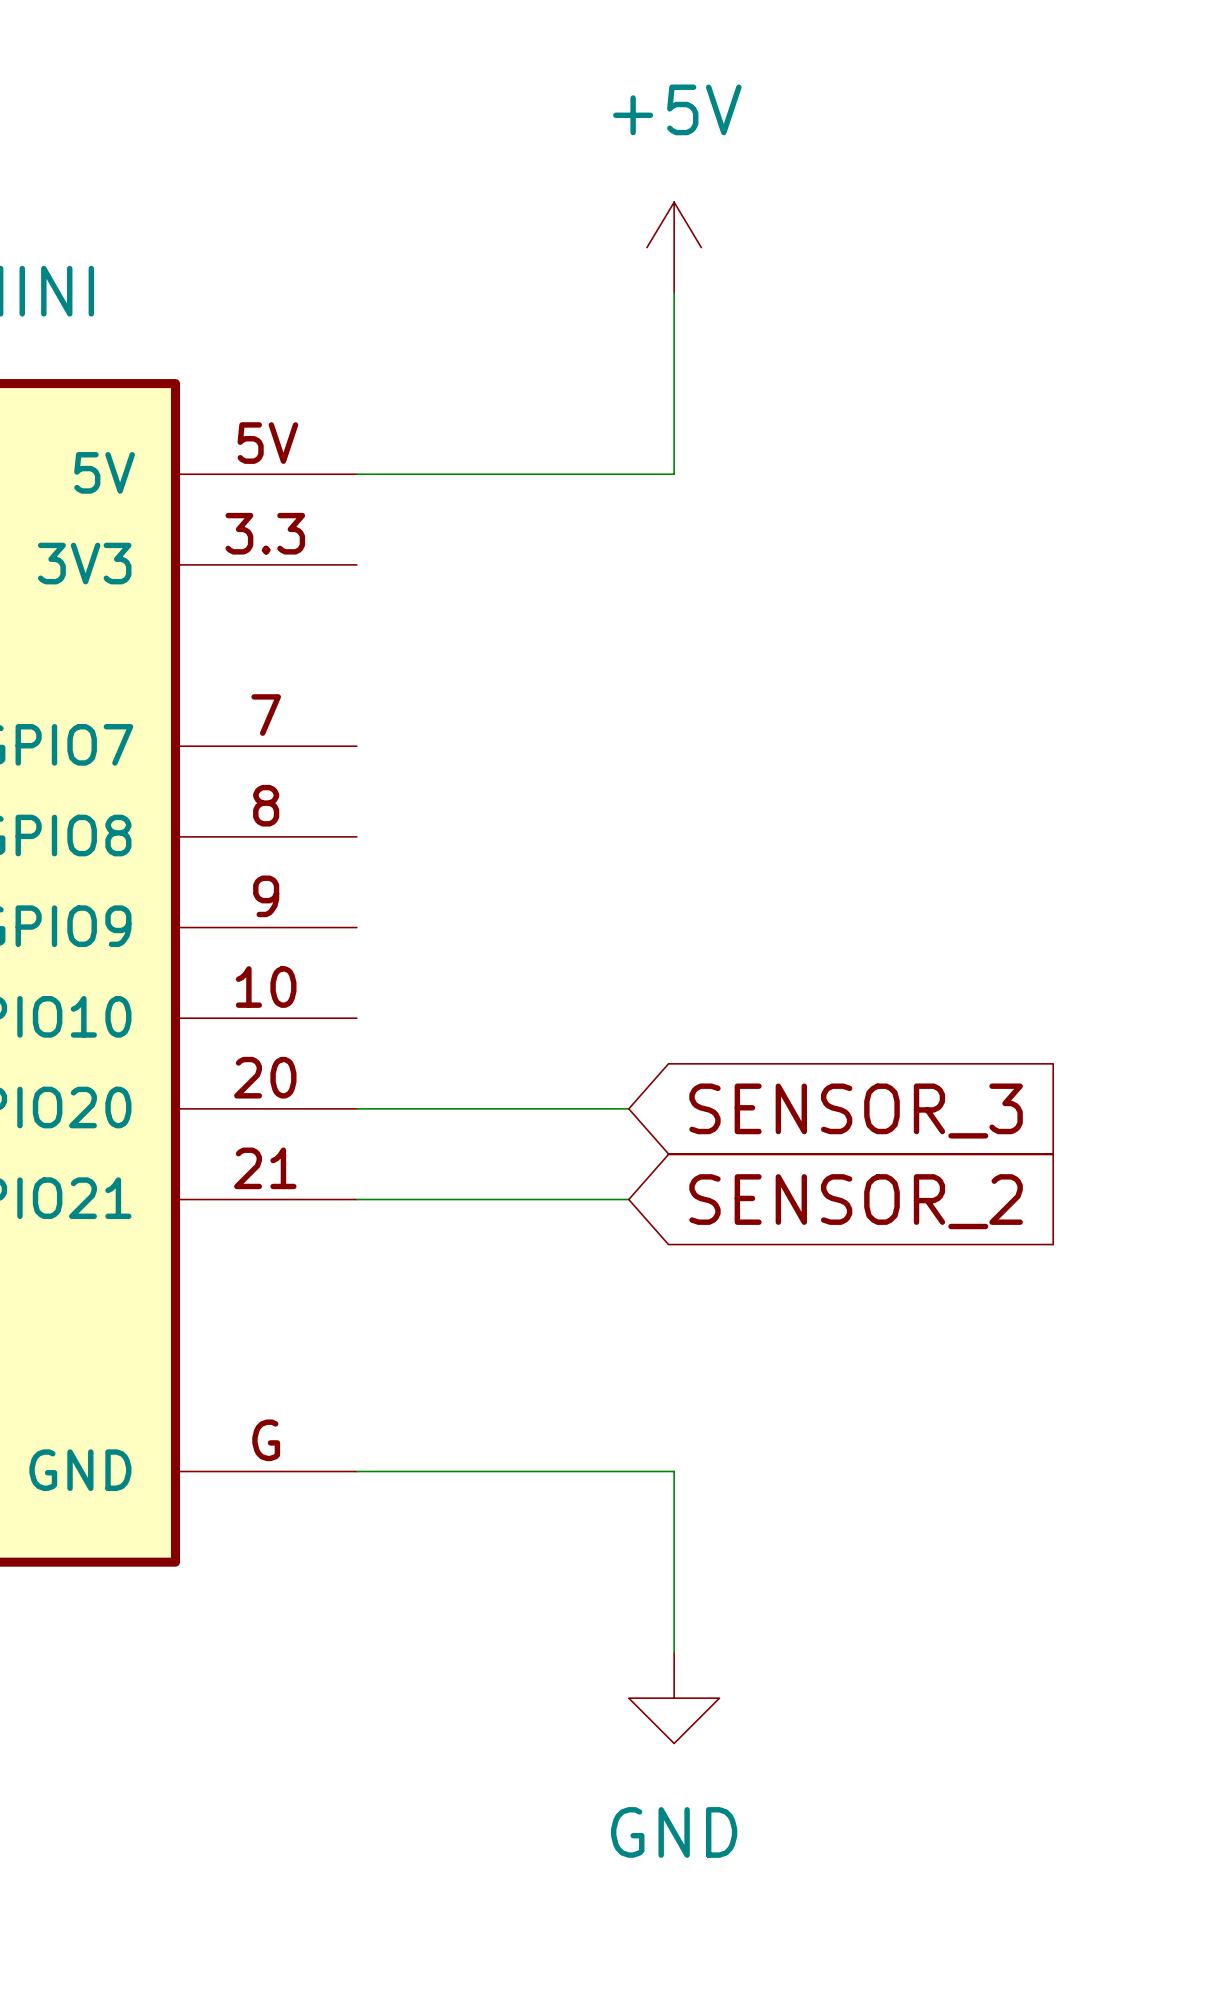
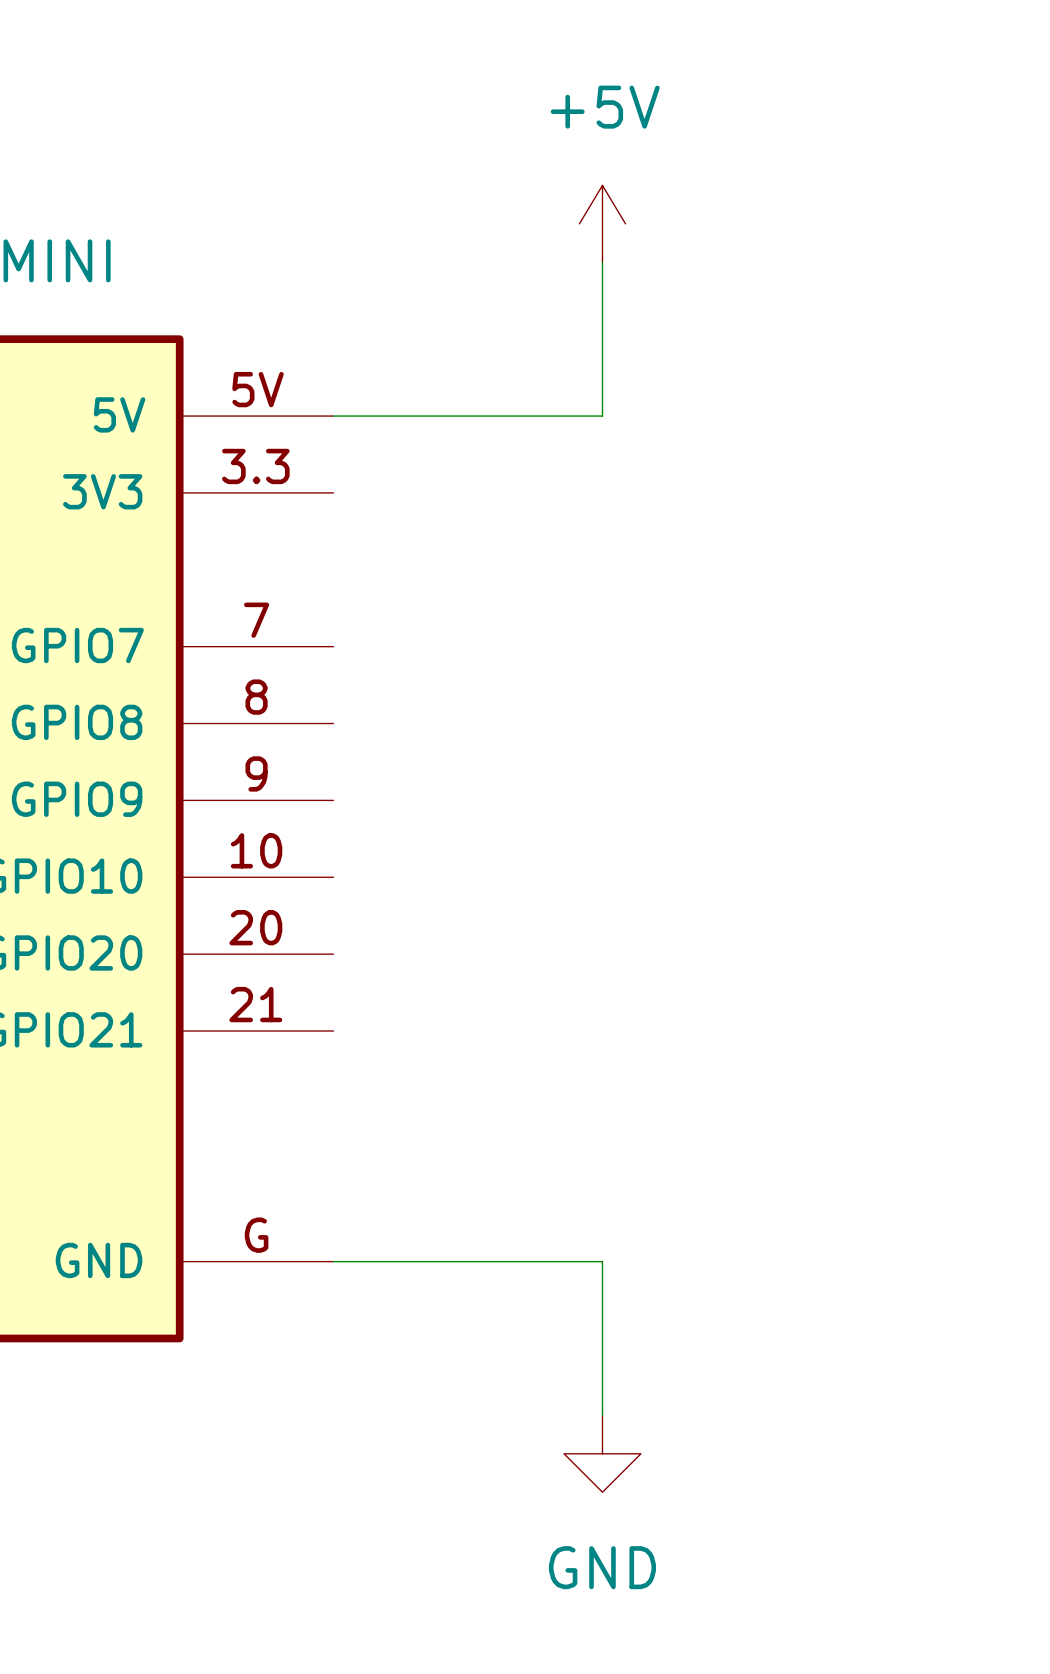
wire: (356, 1108) (628, 1108) -> none
global label: SENSOR_3 (856, 1111) -> none
wire: (356, 1199) (628, 1199) -> none
global label: SENSOR_2 (856, 1201) -> none

